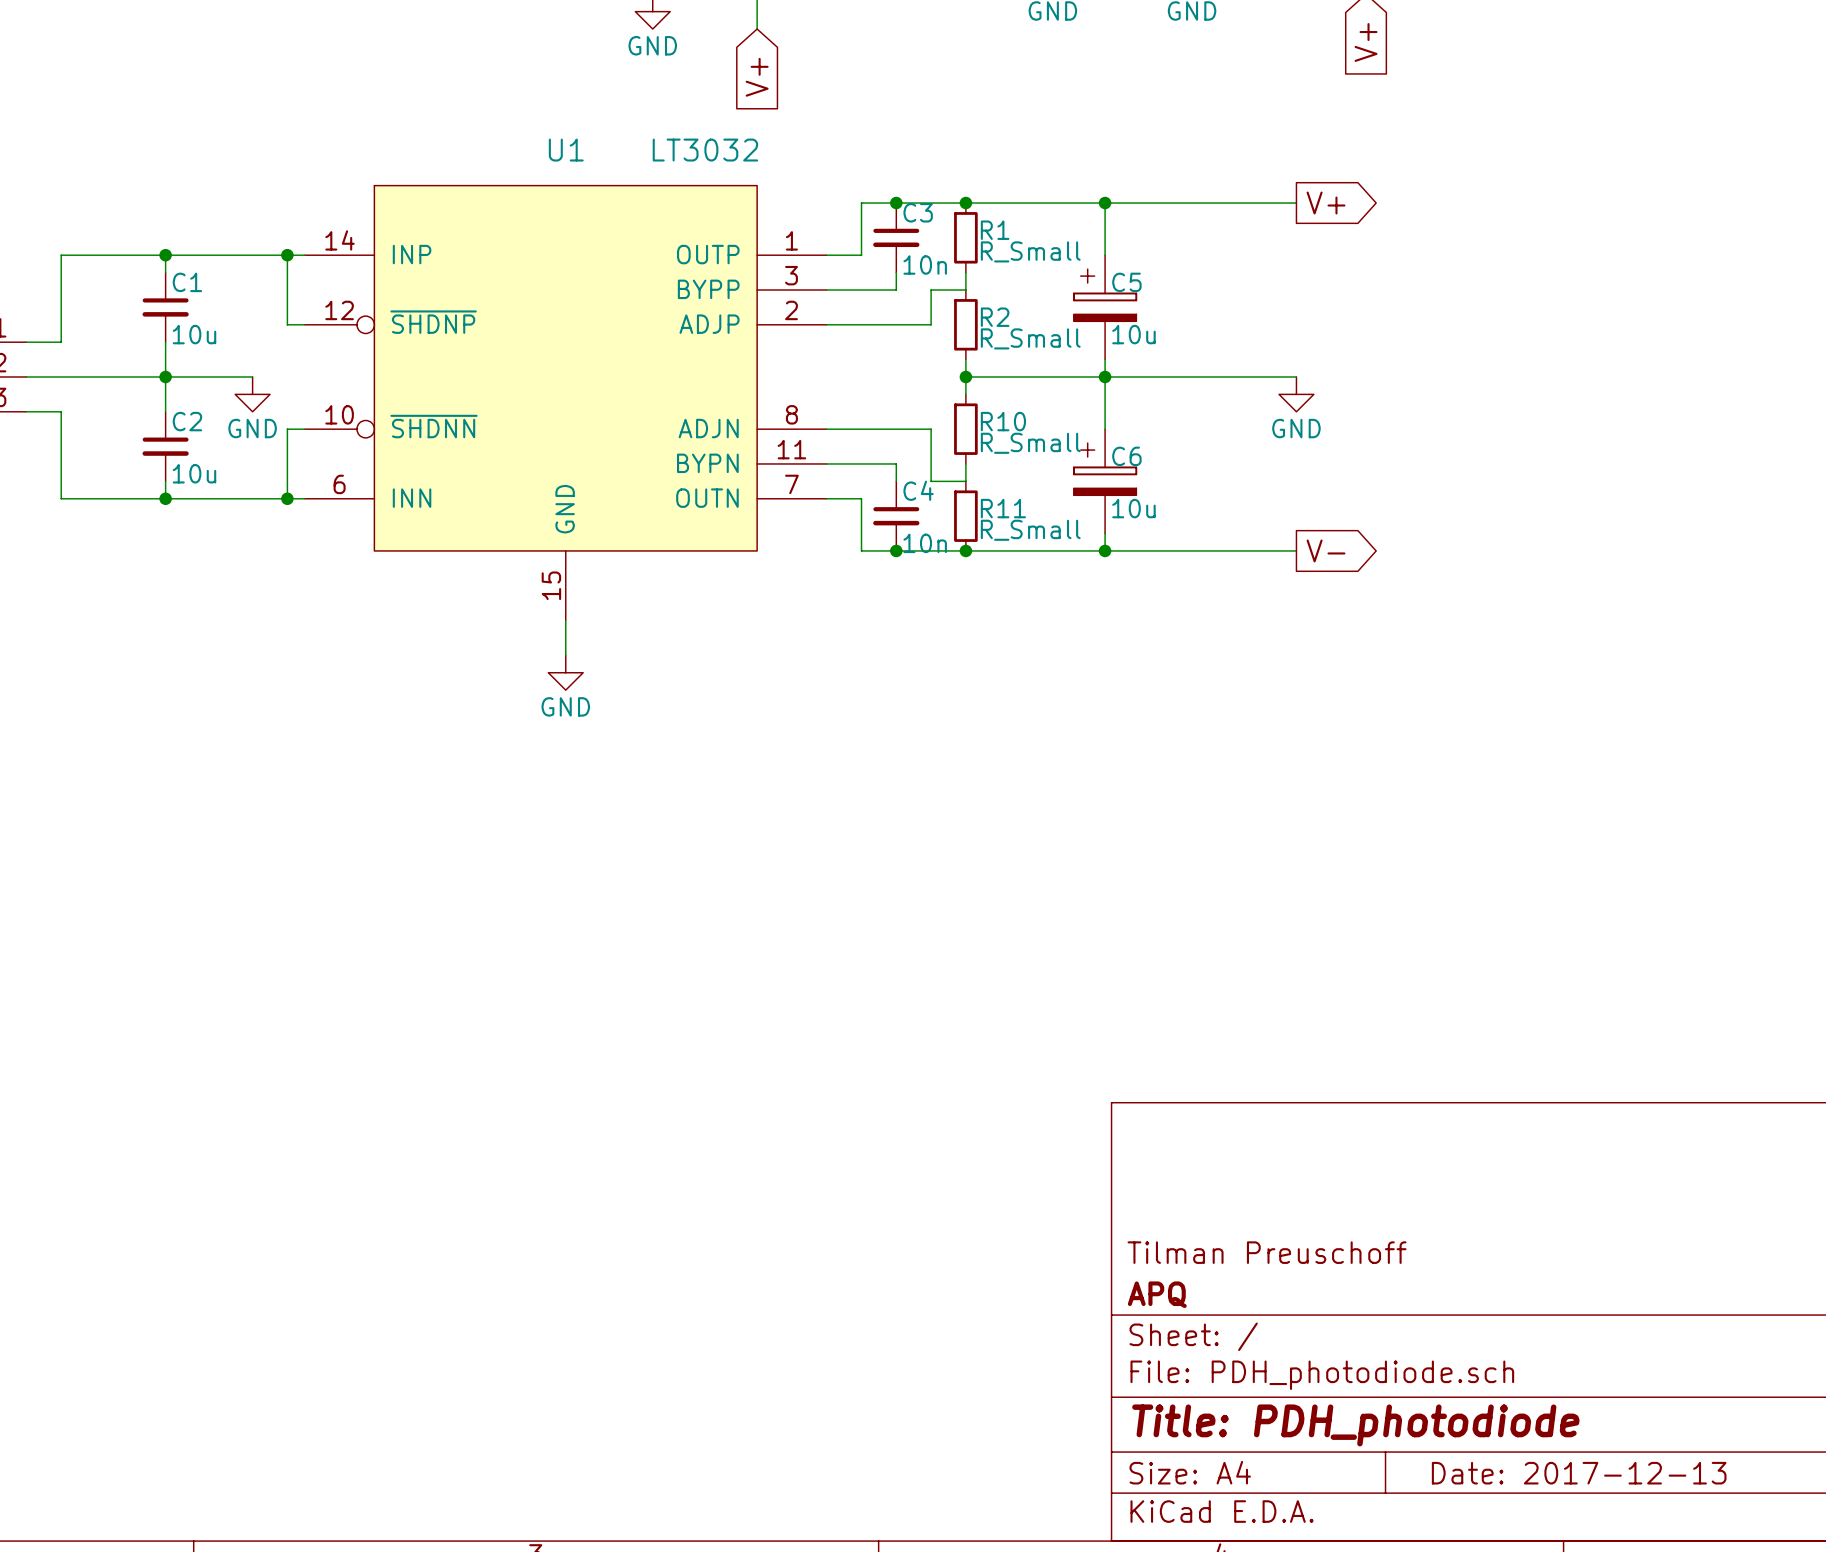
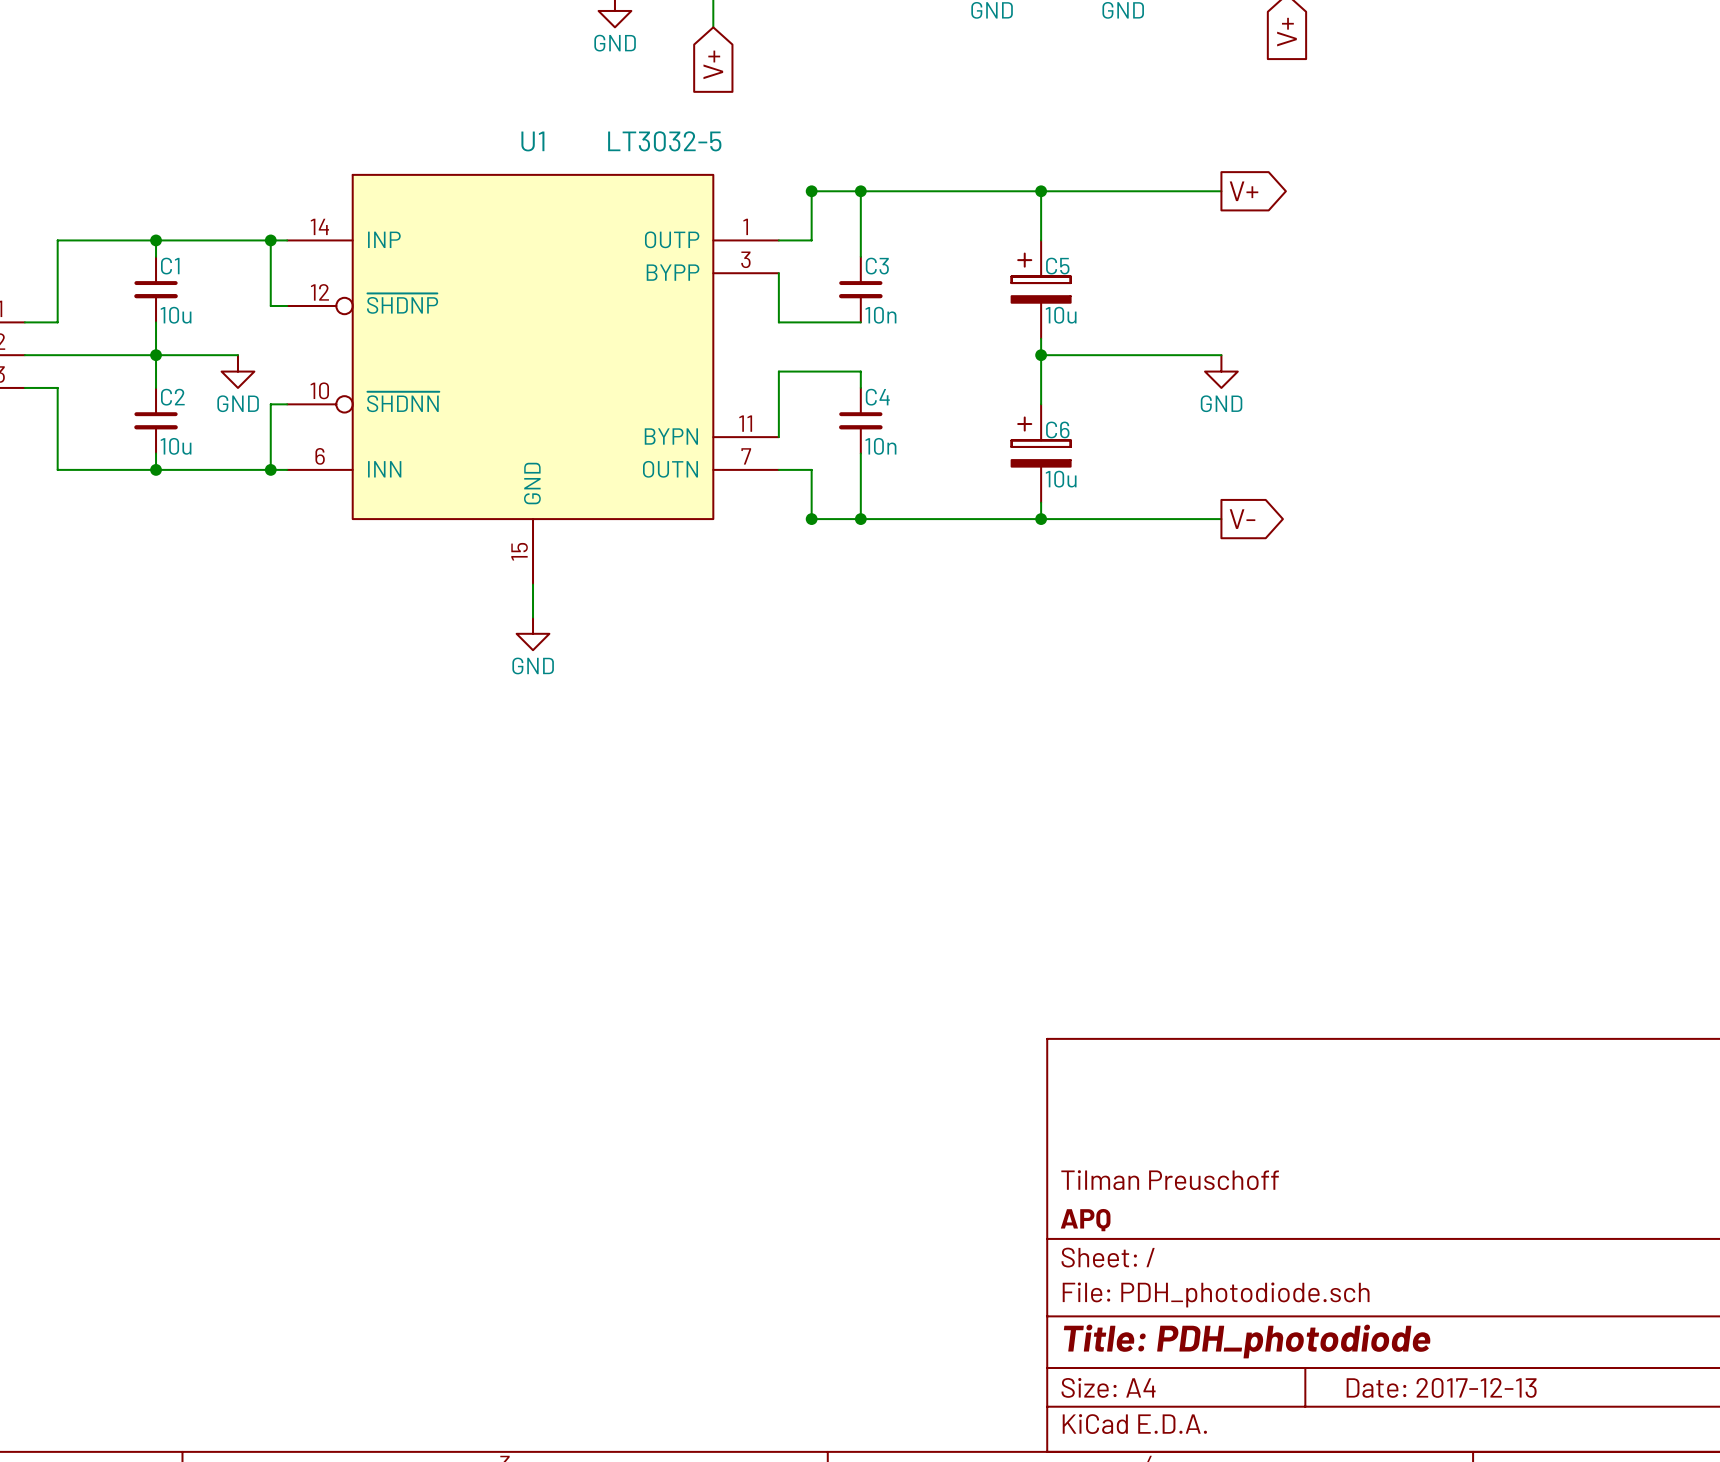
U1 value: LT3032 (705, 150) -> LT3032-5 (664, 141)
U1 symbol: [304, 185, 827, 621] -> [287, 174, 779, 585]
junction: none -> (811, 191)
junction: (896, 203) -> none
wire: none -> (860, 191) (860, 256)
junction: none -> (860, 191)
junction: (965, 203) -> none
C3 position: (896, 237) -> (860, 289)
R1: R_Small (965, 237) -> none
wire: (896, 272) (896, 290) (826, 290) -> (860, 322) (778, 322) (778, 273)
wire: (965, 272) (965, 290) (931, 290) (931, 324) (826, 324) -> none
R2: R_Small (965, 324) -> none
wire: (965, 359) (965, 394) -> none
wire: (965, 376) (1105, 376) -> none
junction: (965, 376) -> none
wire: (826, 429) (931, 429) (931, 481) (965, 481) (965, 463) -> none
R10: R_Small (965, 429) -> none
wire: (826, 463) (896, 463) (896, 481) -> (778, 437) (778, 371) (860, 371) (860, 387)
wire: none -> (860, 453) (860, 519)
C4 position: (896, 516) -> (860, 420)
R11: R_Small (965, 516) -> none
junction: none -> (811, 519)
junction: (896, 550) -> none
junction: none -> (860, 519)
junction: (965, 550) -> none

